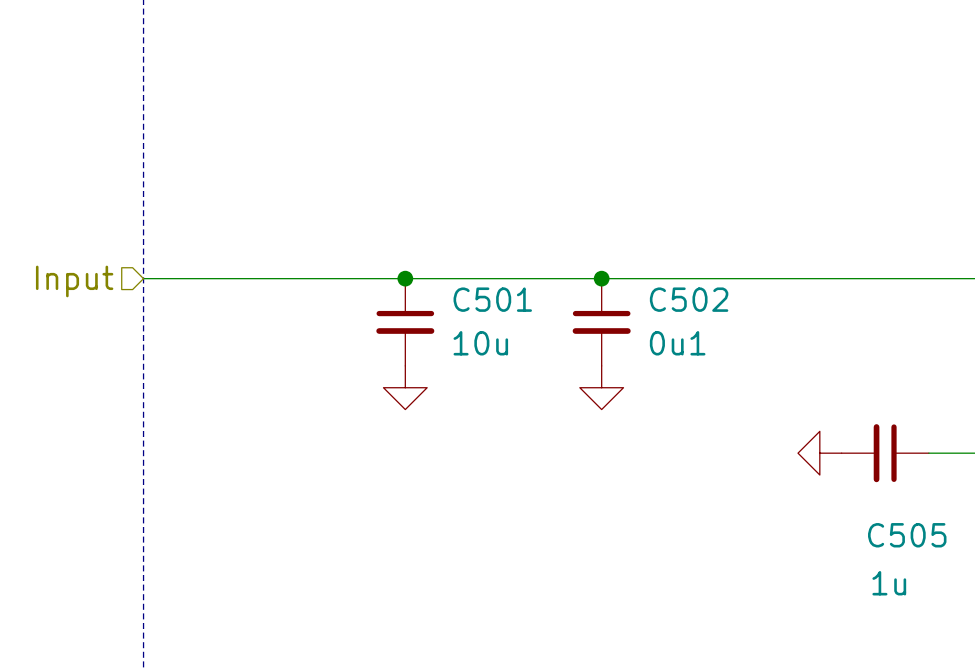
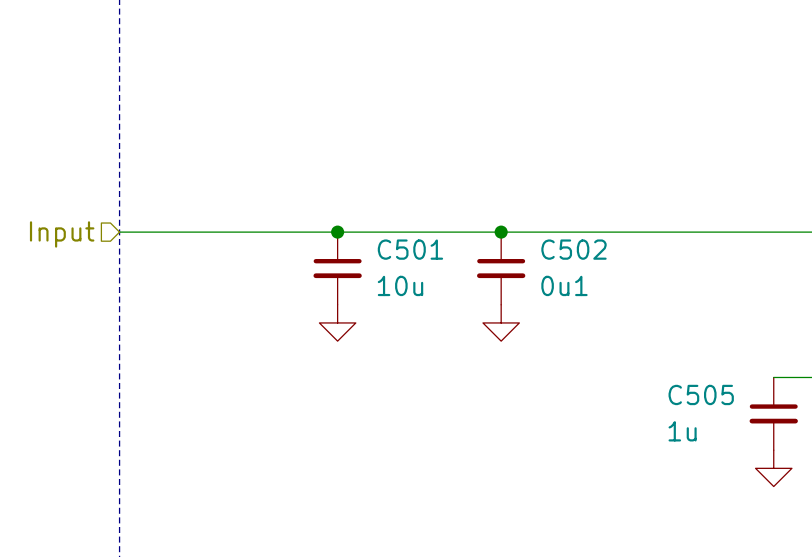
power symbol rotation: 0° (819, 453) -> 90° counterclockwise (773, 468)
power symbol position: (819, 453) -> (773, 468)
C505 rotation: 0° (885, 453) -> 90° counterclockwise (773, 413)
C505 position: (885, 453) -> (773, 413)
C505 name position: C505 (907, 535) -> C505 (701, 394)
C505 value position: 1u (889, 583) -> 1u (682, 431)

